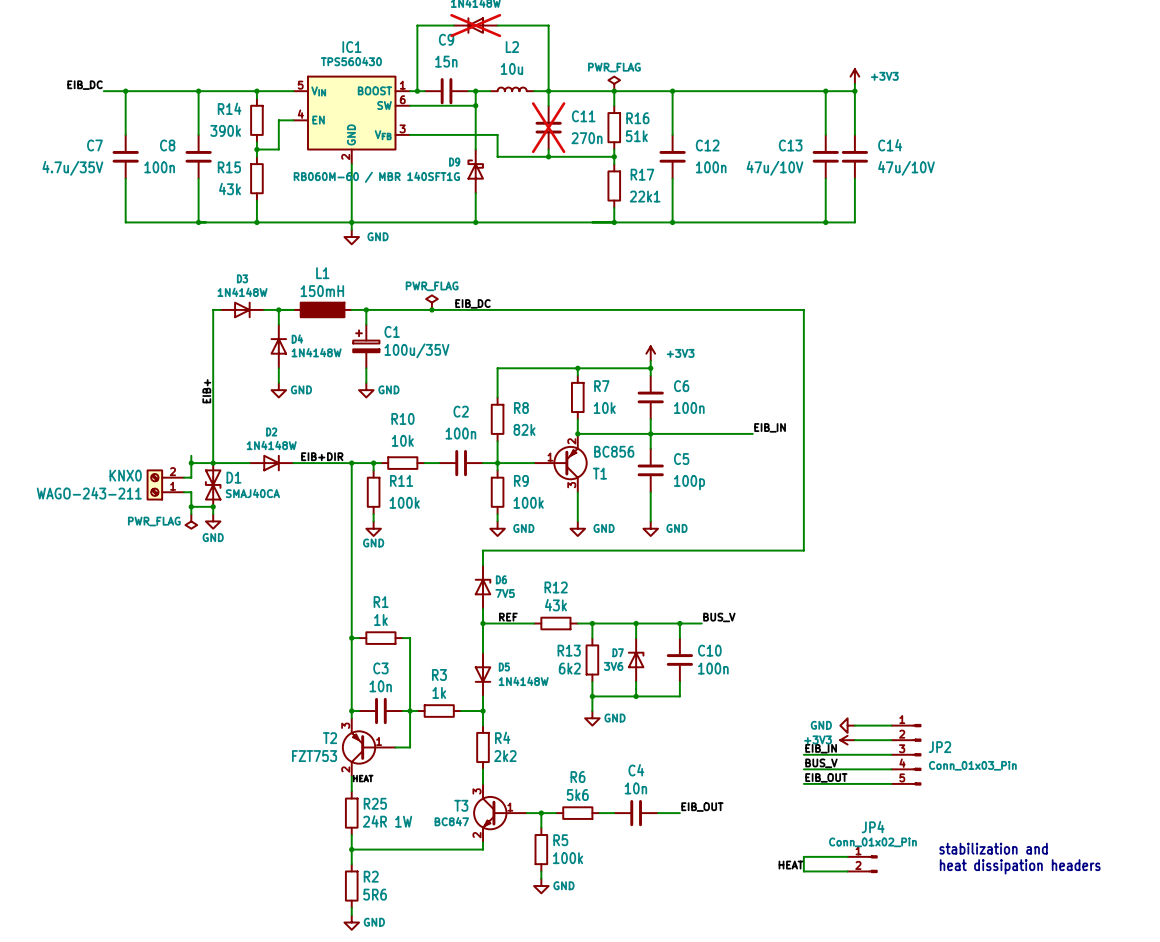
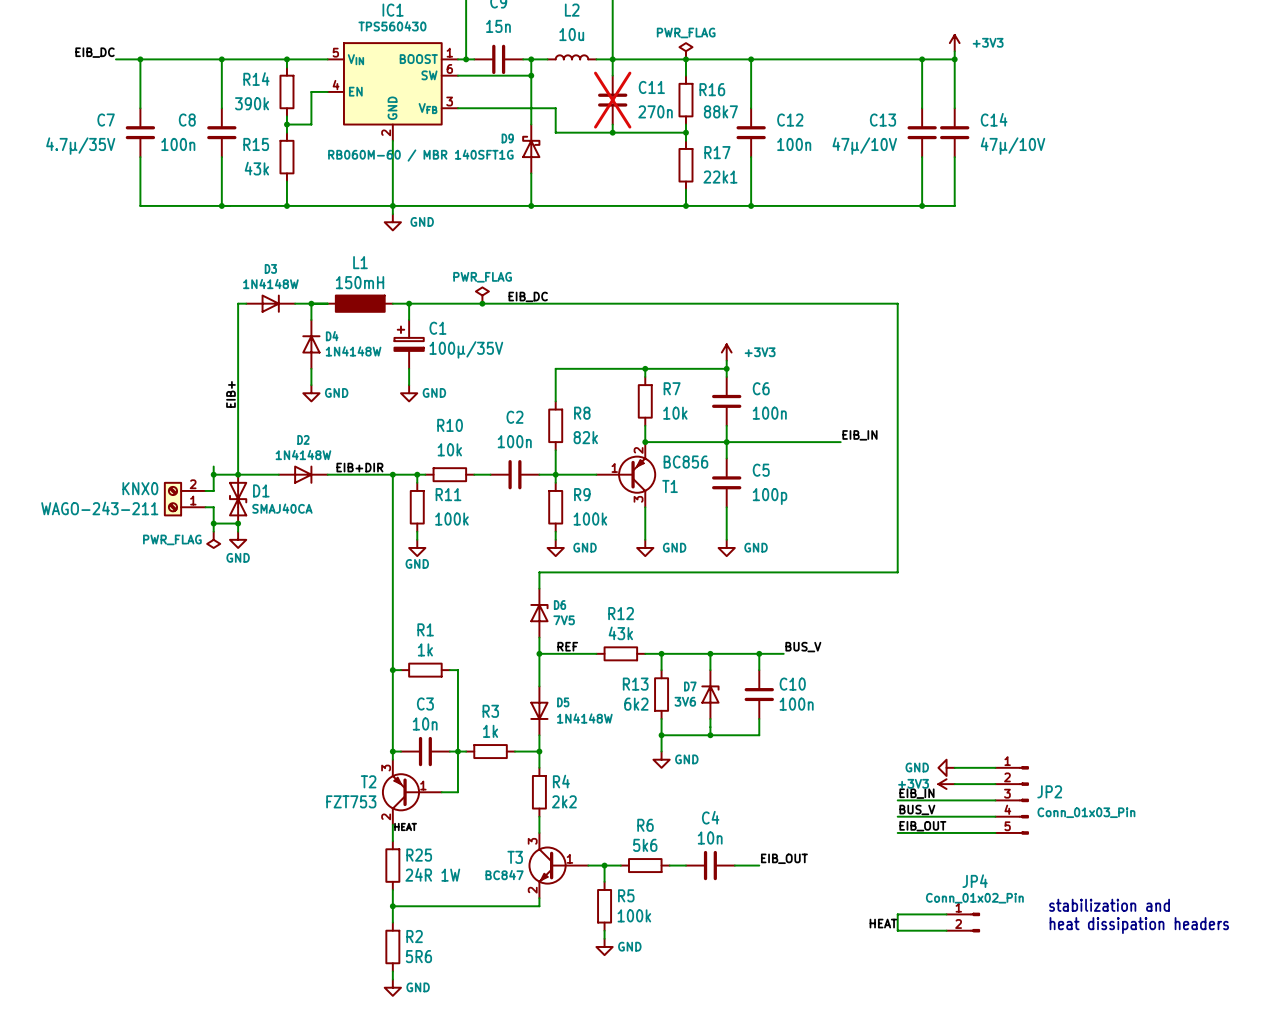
R16 value: 51k (636, 136) -> 88k7 (720, 111)
C7 value: 4.7u/35V (72, 168) -> 4.7µ/35V (80, 146)
C13 value: 47u/10V (774, 168) -> 47µ/10V (864, 146)
C14 value: 47u/10V (906, 168) -> 47µ/10V (1013, 146)
C1 value: 100u/35V (416, 350) -> 100µ/35V (466, 349)

